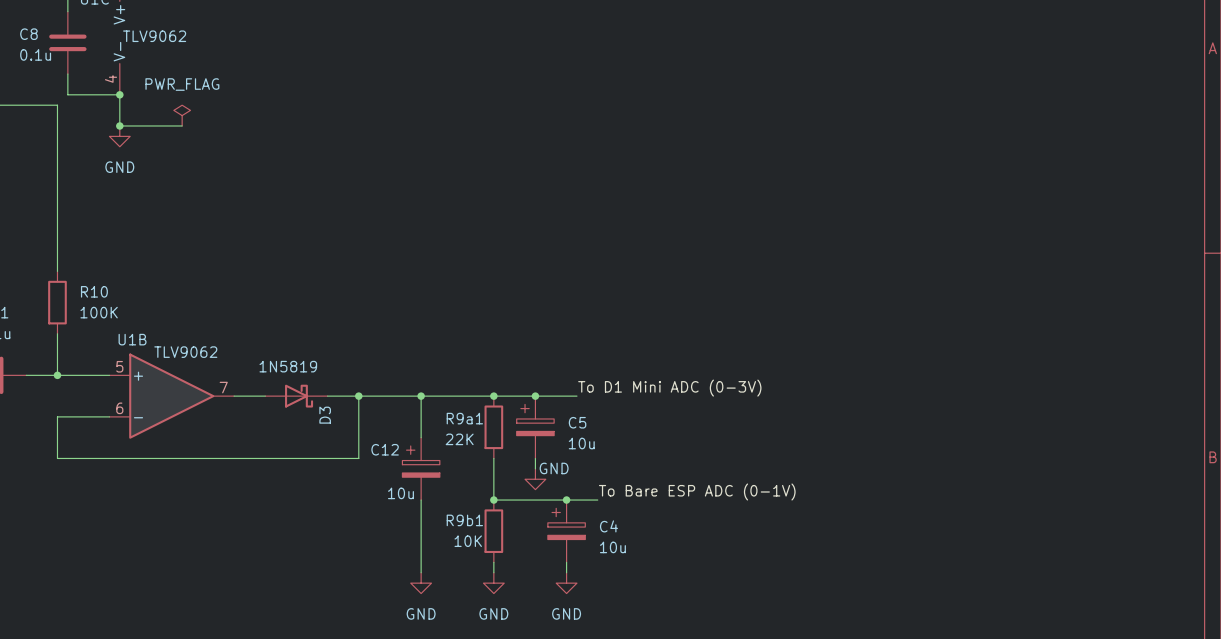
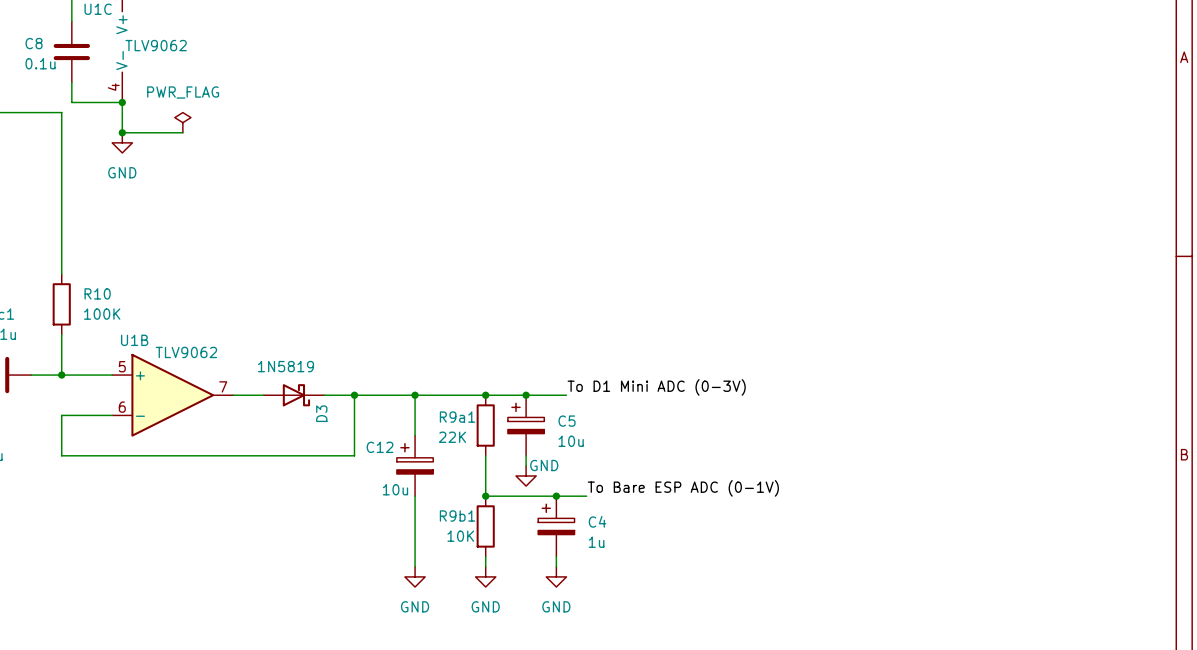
C4 value: 10u (612, 547) -> 1u (596, 542)

